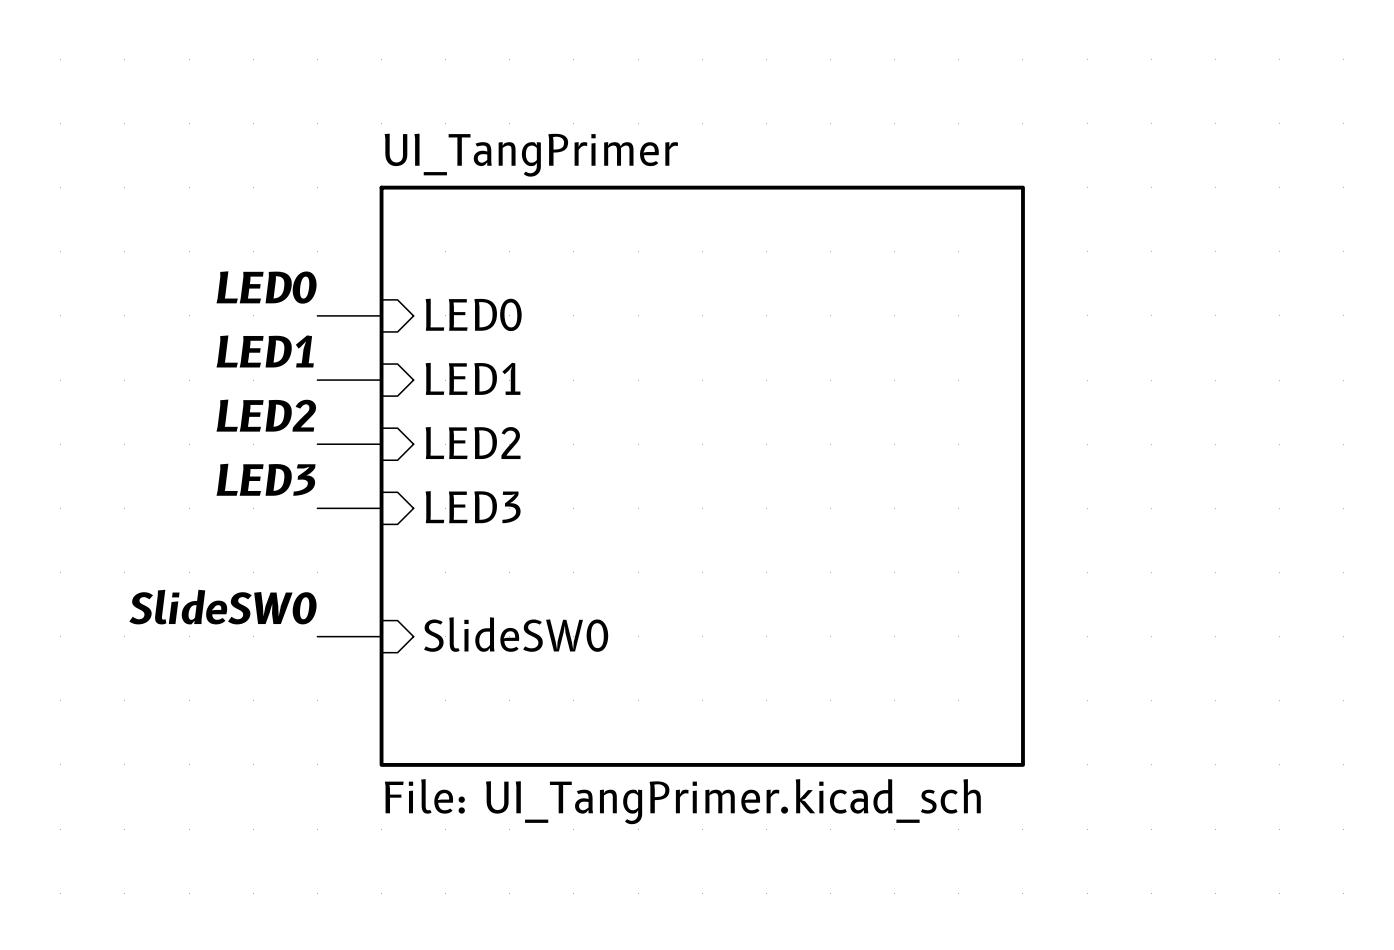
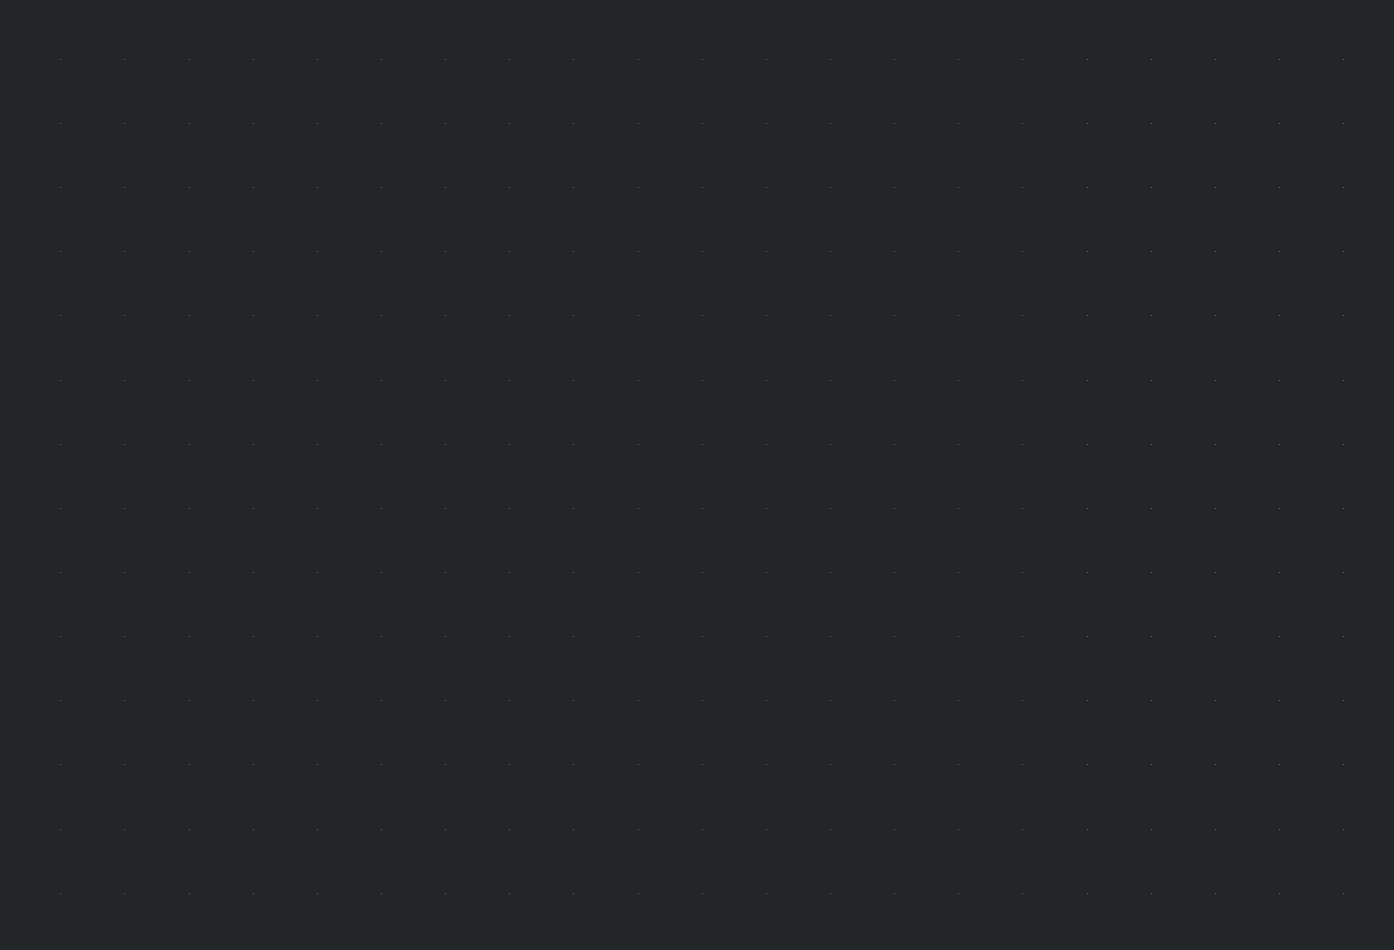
label: LED0 (266, 287) -> none
sheet pin: LED0 (473, 314) -> none
wire: (317, 315) (381, 315) -> none
label: LED1 (265, 351) -> none
sheet pin: LED1 (473, 378) -> none
wire: (317, 380) (381, 380) -> none
label: LED2 (266, 415) -> none
sheet pin: LED2 (473, 443) -> none
wire: (317, 444) (381, 444) -> none
sheet UI_TangPrimer: File: UI_TangPrimer.kicad_sch (702, 476) -> none
label: LED3 (266, 479) -> none
sheet pin: LED3 (473, 507) -> none
wire: (317, 508) (381, 508) -> none
label: SlideSW0 (222, 607) -> none
sheet pin: SlideSW0 (516, 634) -> none
wire: (317, 636) (381, 636) -> none

